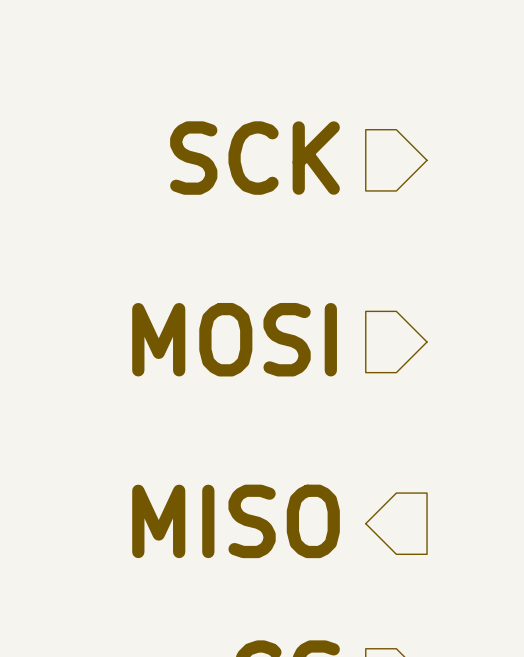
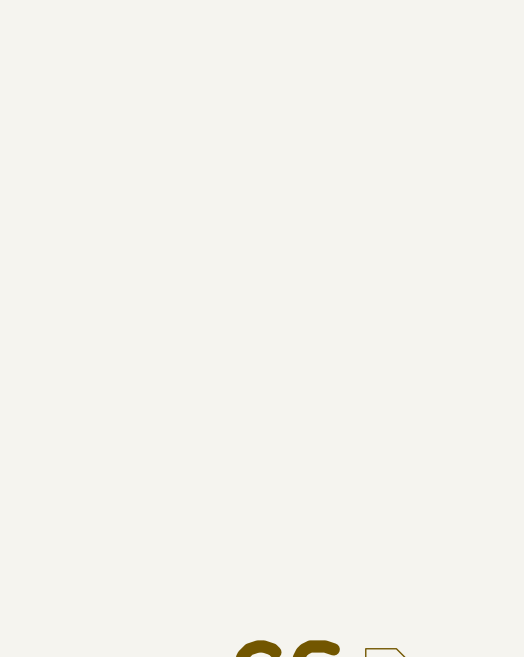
hierarchical label: SCK (254, 158) -> none
hierarchical label: MOSI (234, 339) -> none
hierarchical label: MISO (236, 521) -> none

